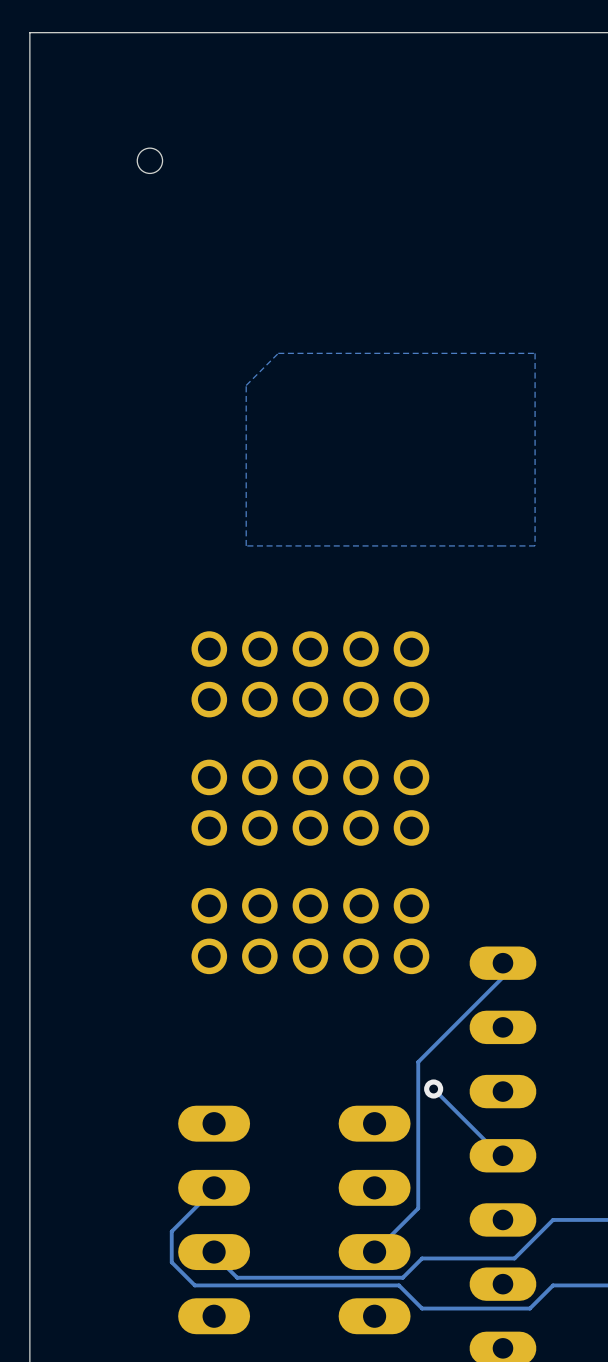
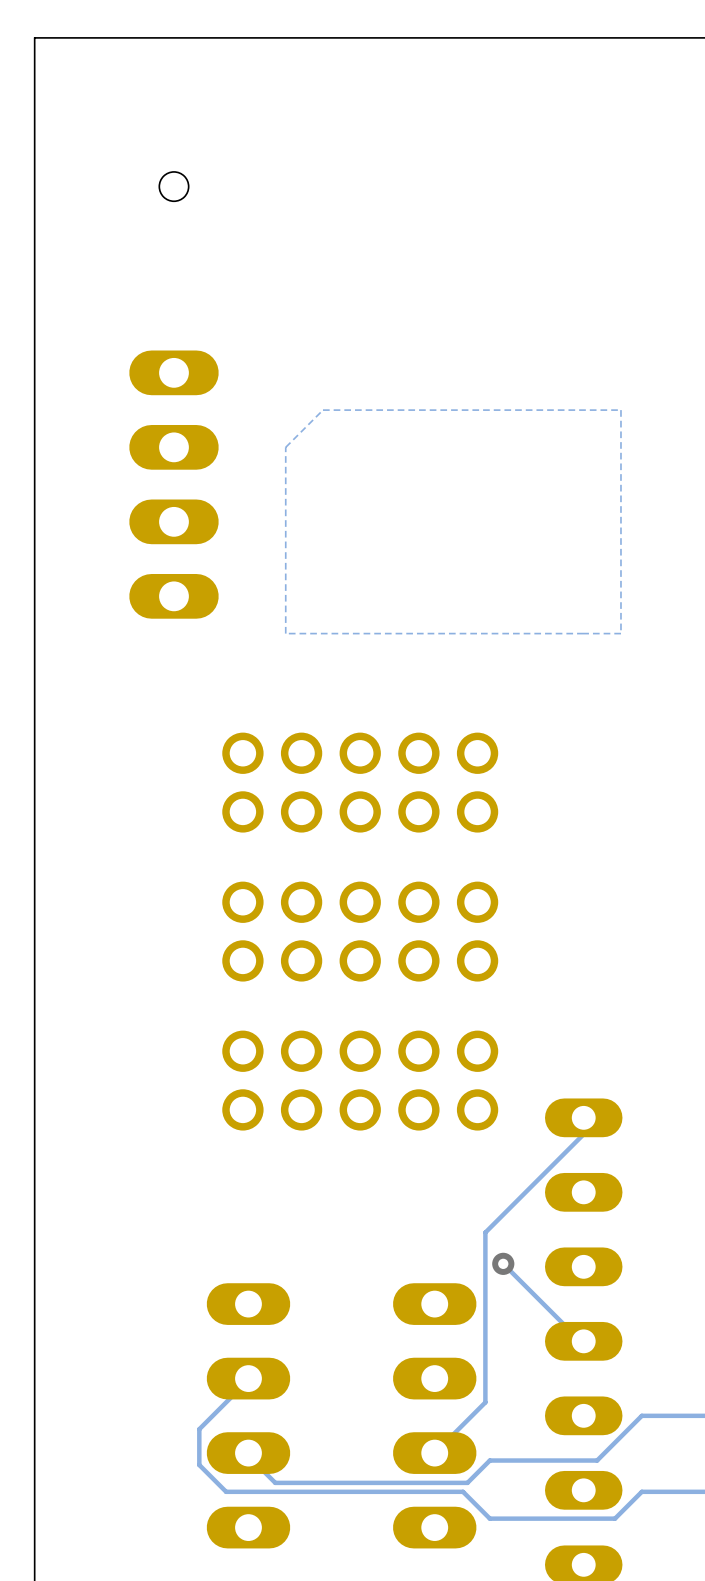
part: none -> (173, 484)

